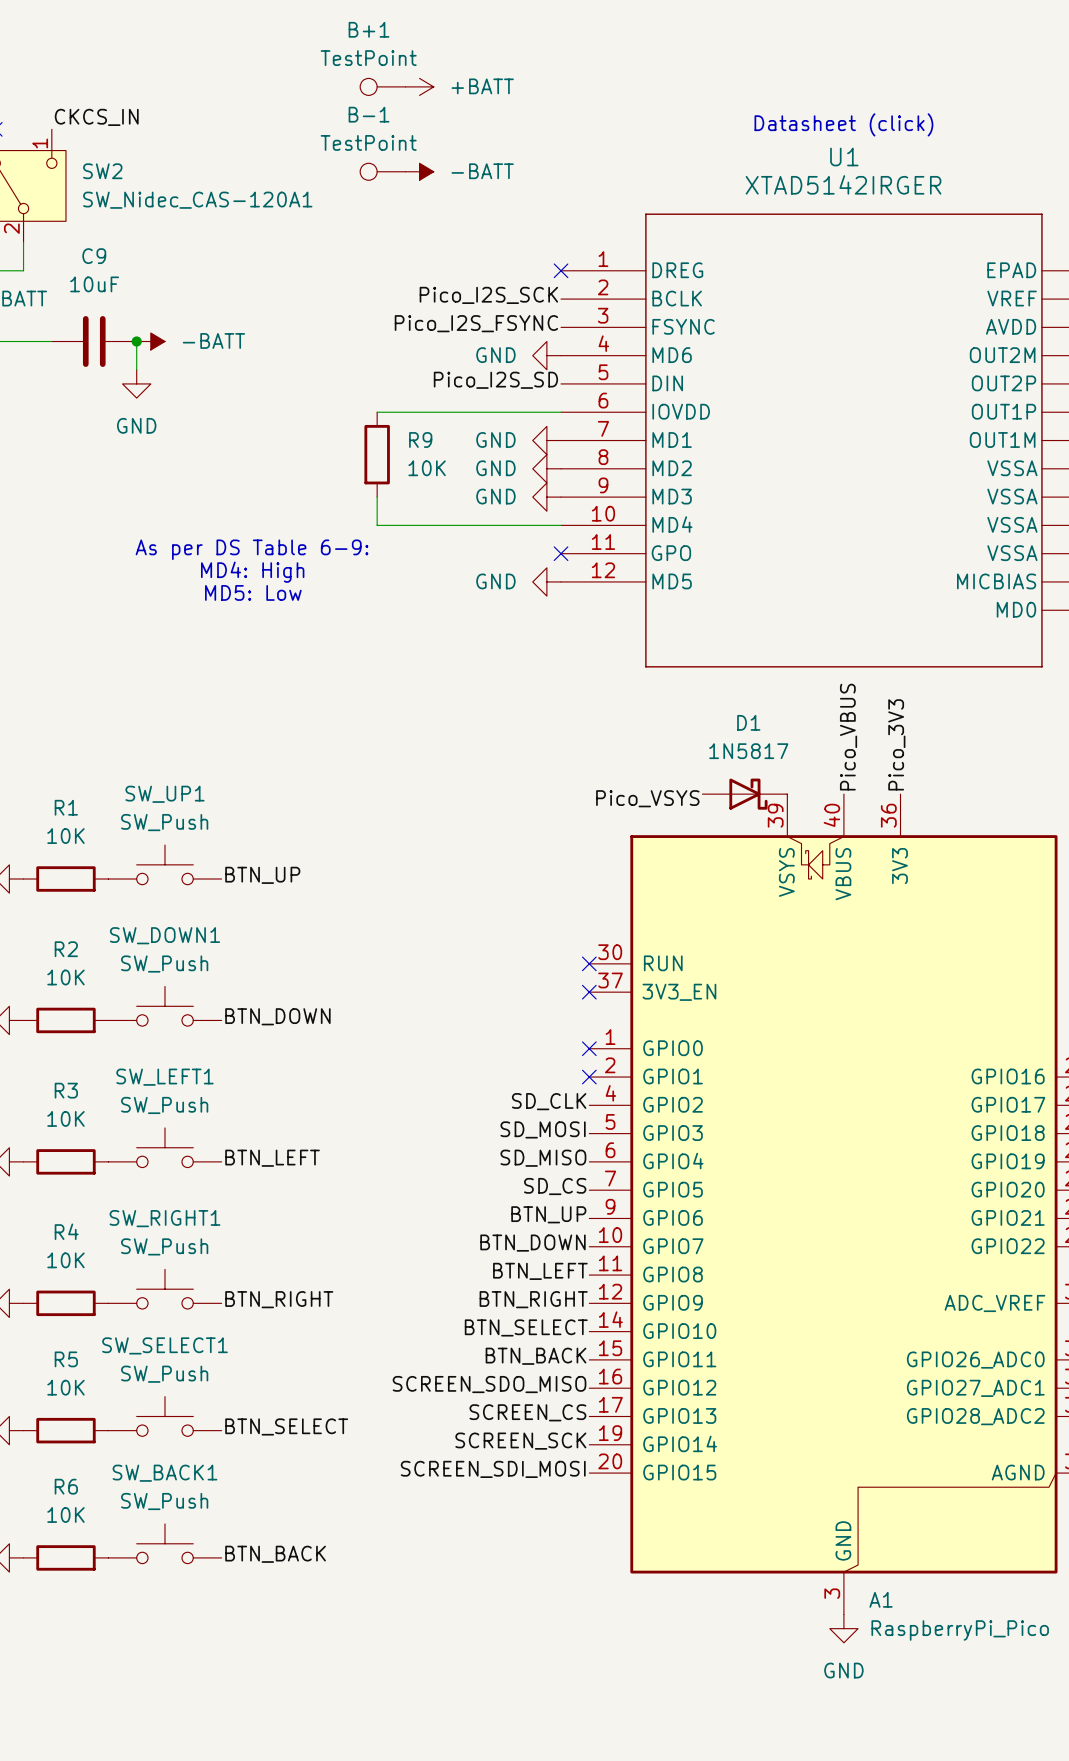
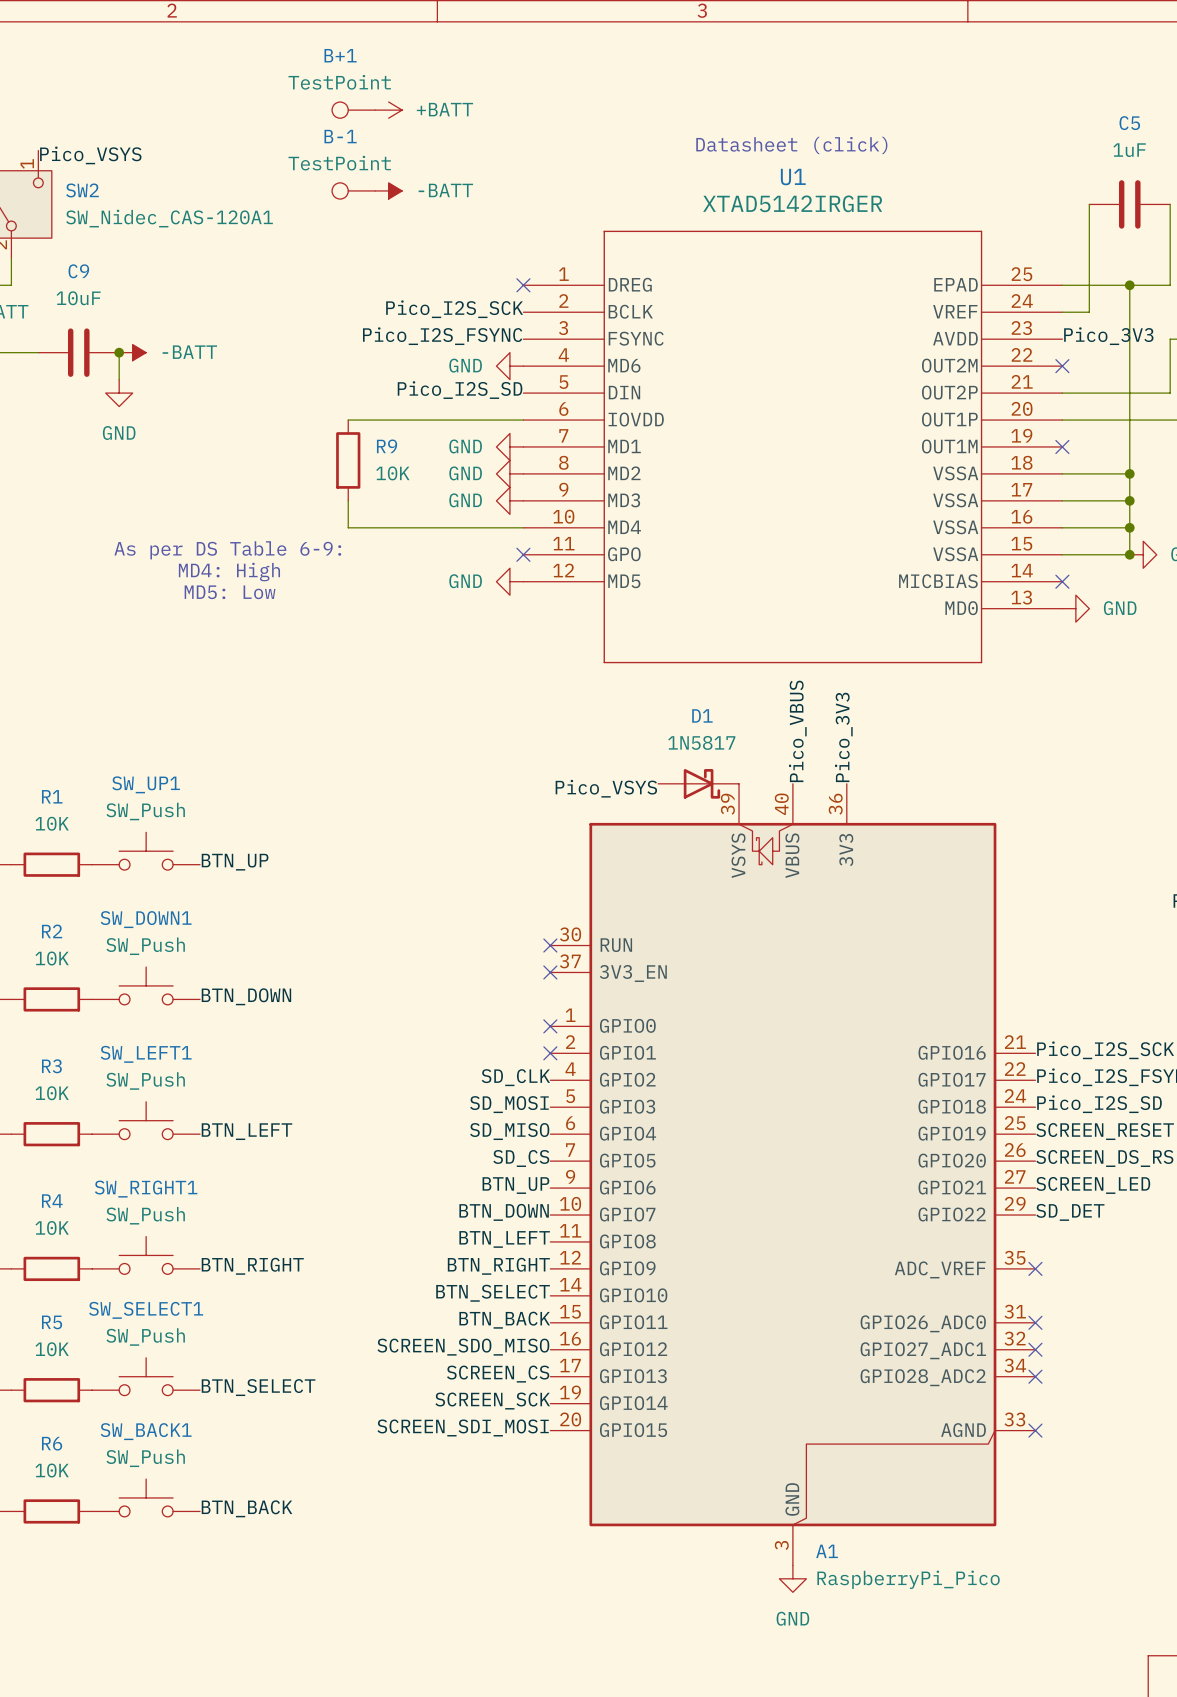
label: CKCS_IN (96, 117) -> Pico_VSYS (90, 155)

